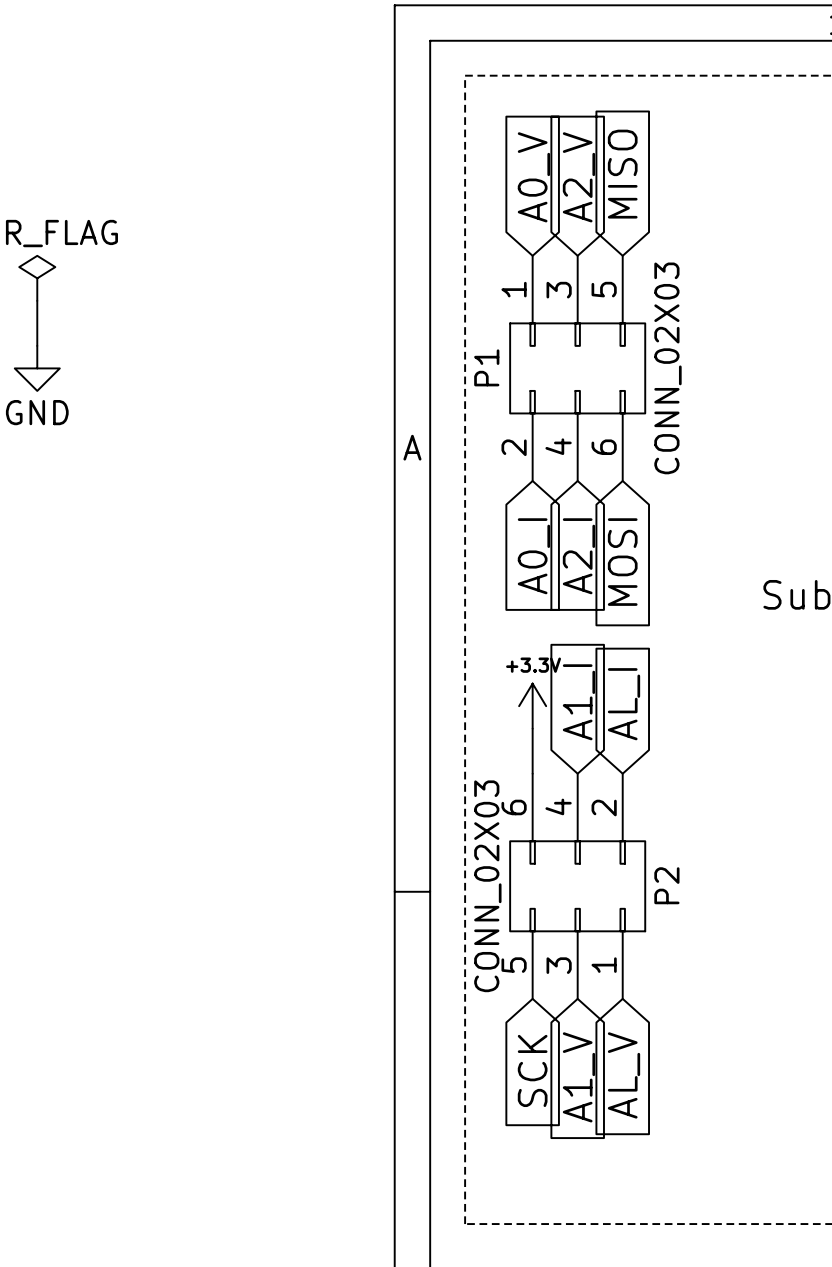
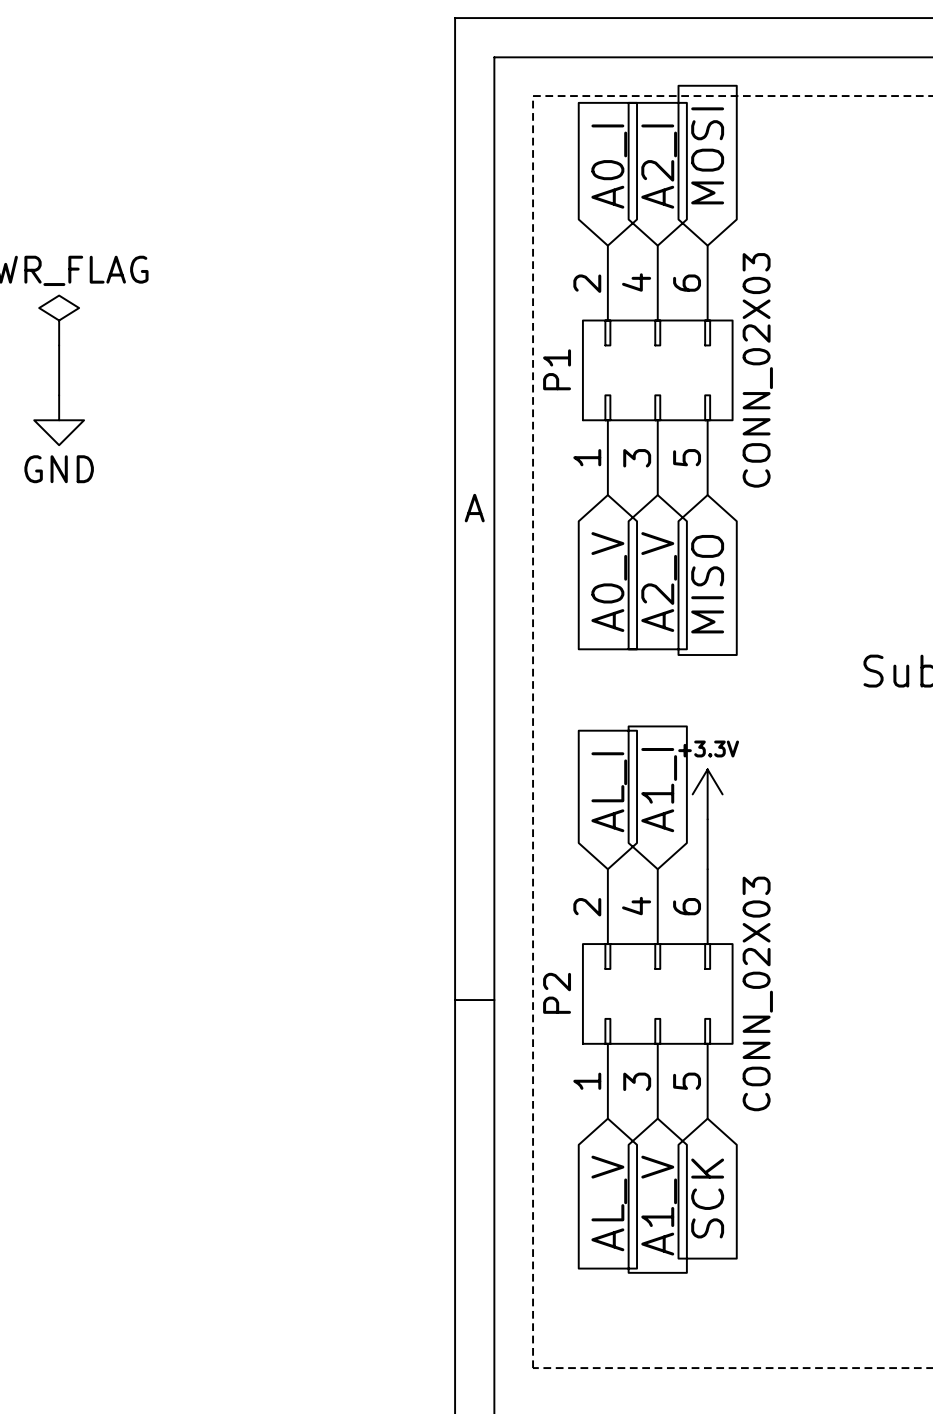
global label rotation: 0° (622, 174) -> 180° (707, 584)
global label position: MISO (622, 174) -> MISO (707, 584)
global label rotation: 0° (533, 177) -> 180° (609, 582)
global label position: A0_V (533, 177) -> A0_V (609, 582)
global label rotation: 0° (578, 177) -> 180° (659, 582)
global label position: A2_V (578, 177) -> A2_V (659, 582)
P1 flip: as is (577, 368) -> up-down (657, 370)
global label rotation: 0° (533, 556) -> 180° (609, 166)
global label position: A0_I (533, 556) -> A0_I (609, 166)
global label rotation: 0° (578, 556) -> 180° (659, 166)
global label position: A2_I (578, 556) -> A2_I (659, 166)
global label rotation: 0° (622, 562) -> 180° (707, 155)
global label position: MOSI (622, 562) -> MOSI (707, 155)
global label position: AL_I (624, 704) -> AL_I (609, 792)
power symbol position: +3.3V (532, 706) -> +3.3V (707, 794)
wire: (532, 728) (532, 773) -> (707, 819) (707, 869)
P2 flip: as is (577, 886) -> left-right (657, 993)
global label: SCK (532, 1070) -> AL_V (609, 1203)
global label: AL_V (624, 1075) -> SCK (707, 1198)

